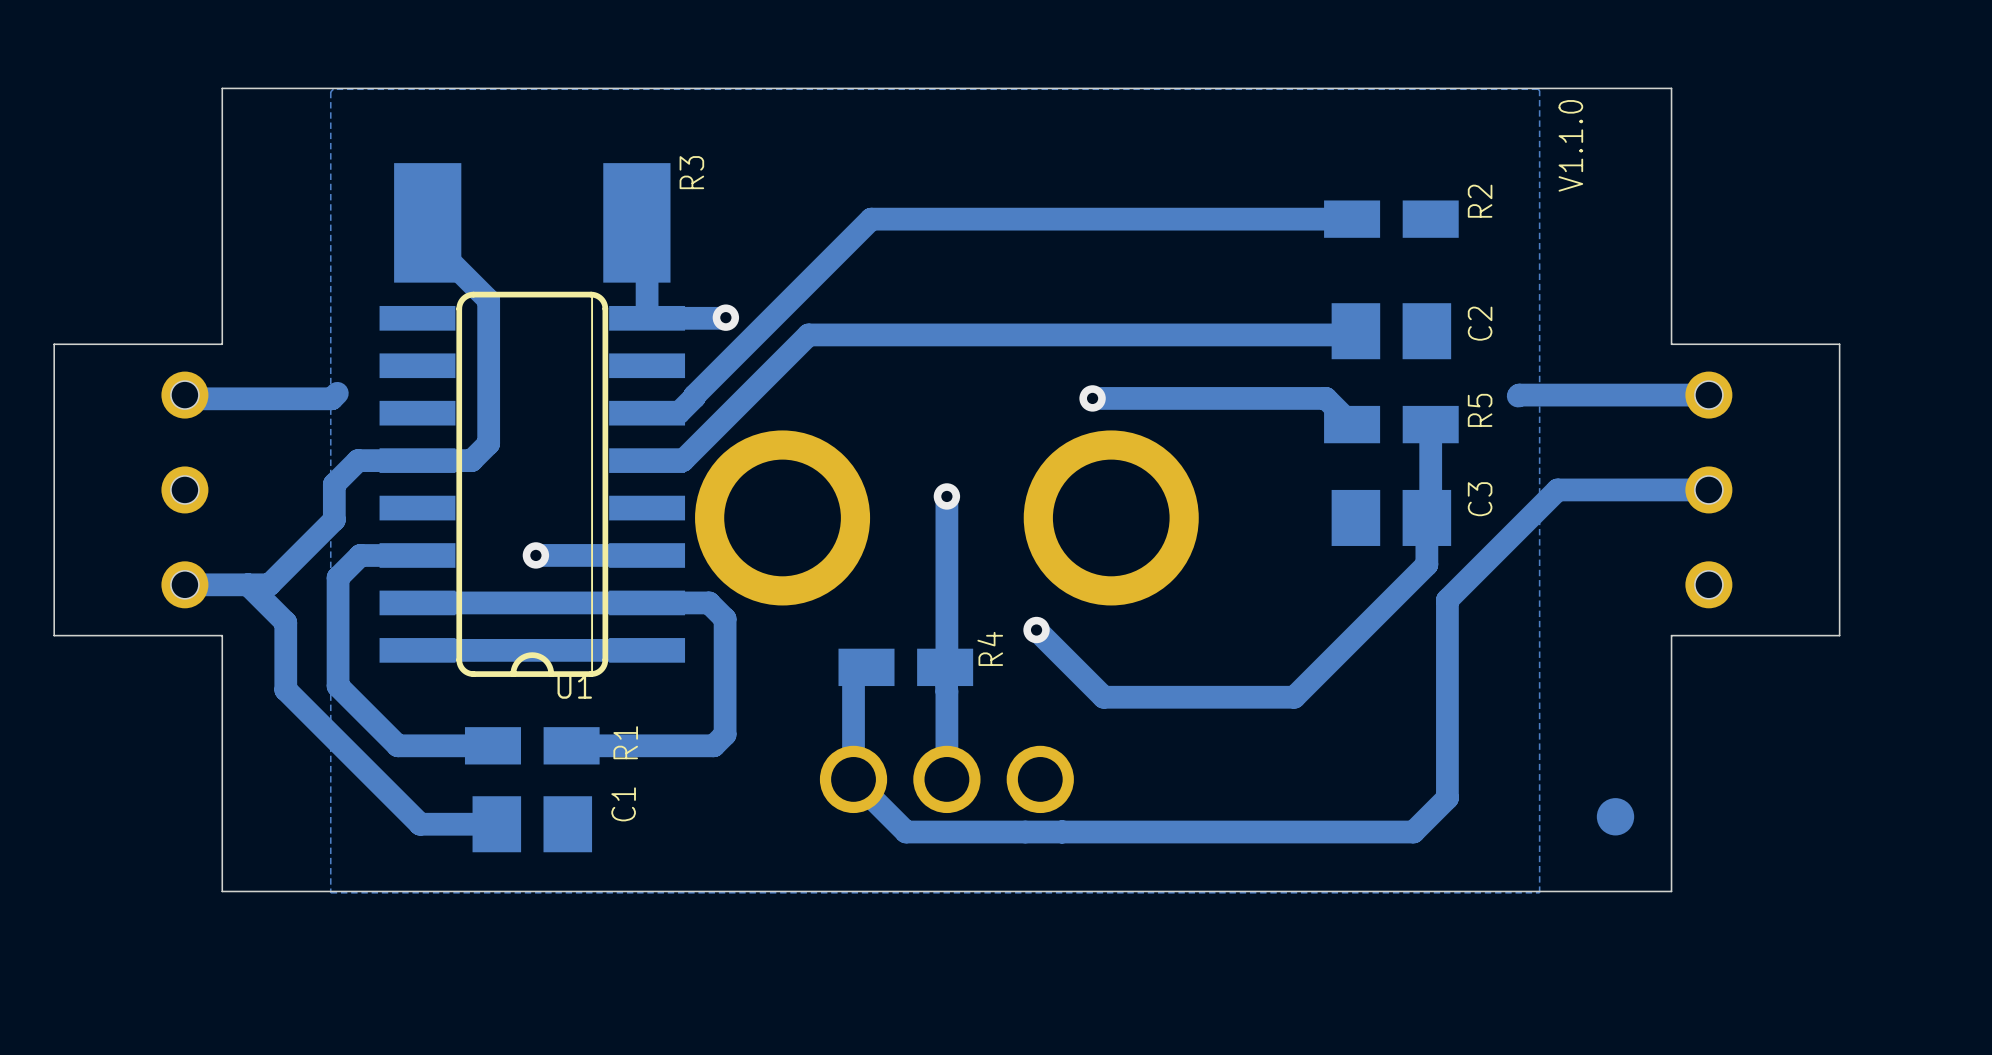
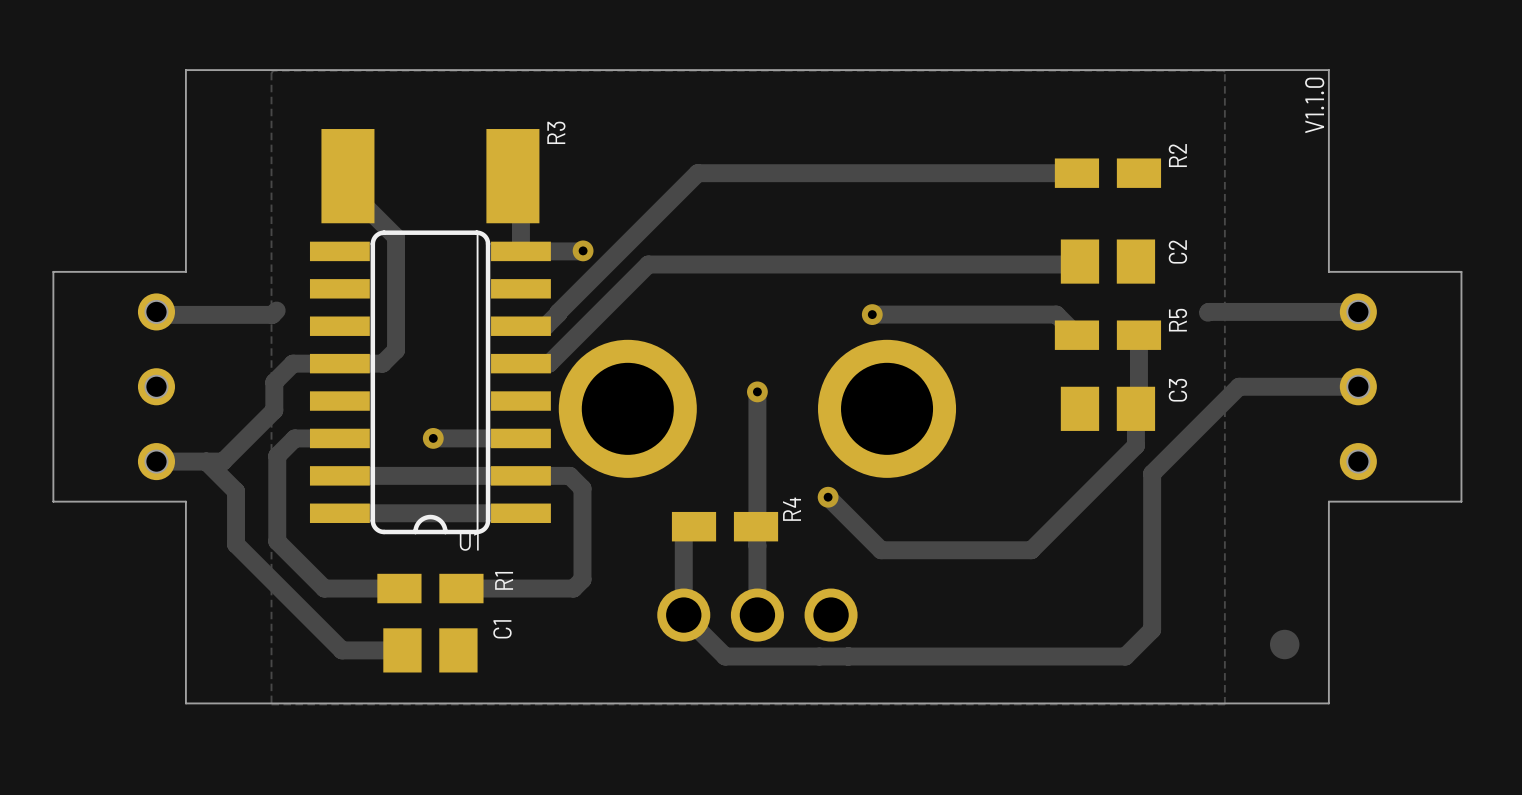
drawing: none -> [1305, 77, 1325, 134]
text: V1.1.0 (1570, 145) -> none

